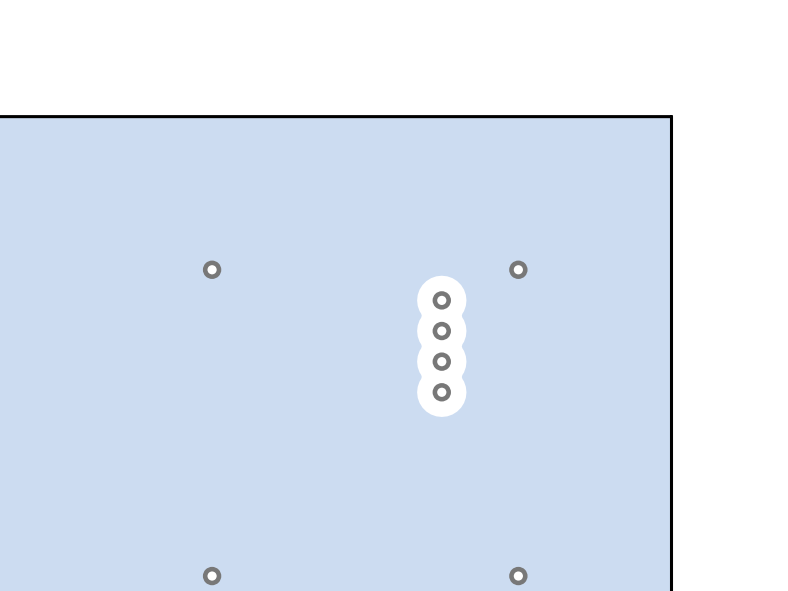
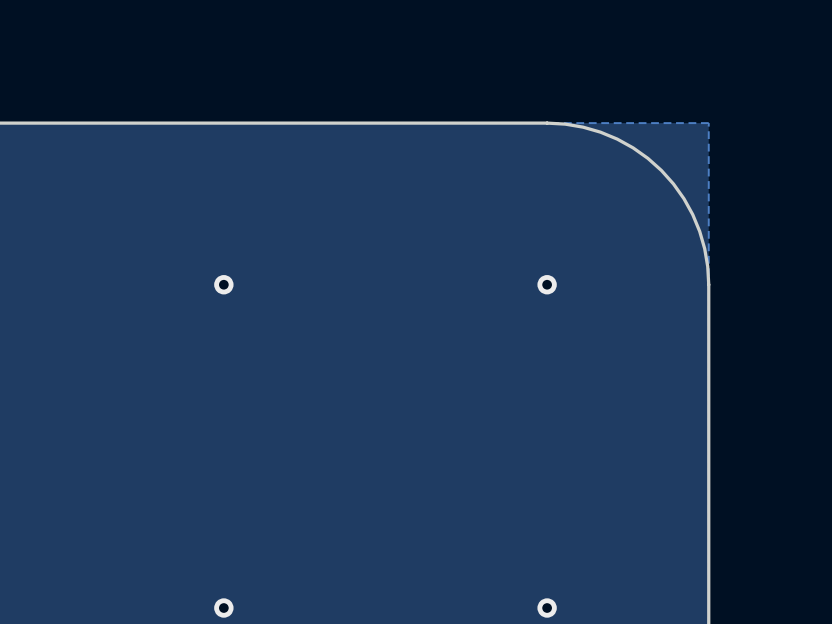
board edge: (518, 116) (671, 116) (671, 269) -> (547, 123) (565, 124) (600, 132) (633, 147) (661, 170) (683, 198) (692, 214) (704, 248) (708, 284)
via: (441, 300) -> none
via: (441, 331) -> none
via: (441, 361) -> none
via: (441, 392) -> none

